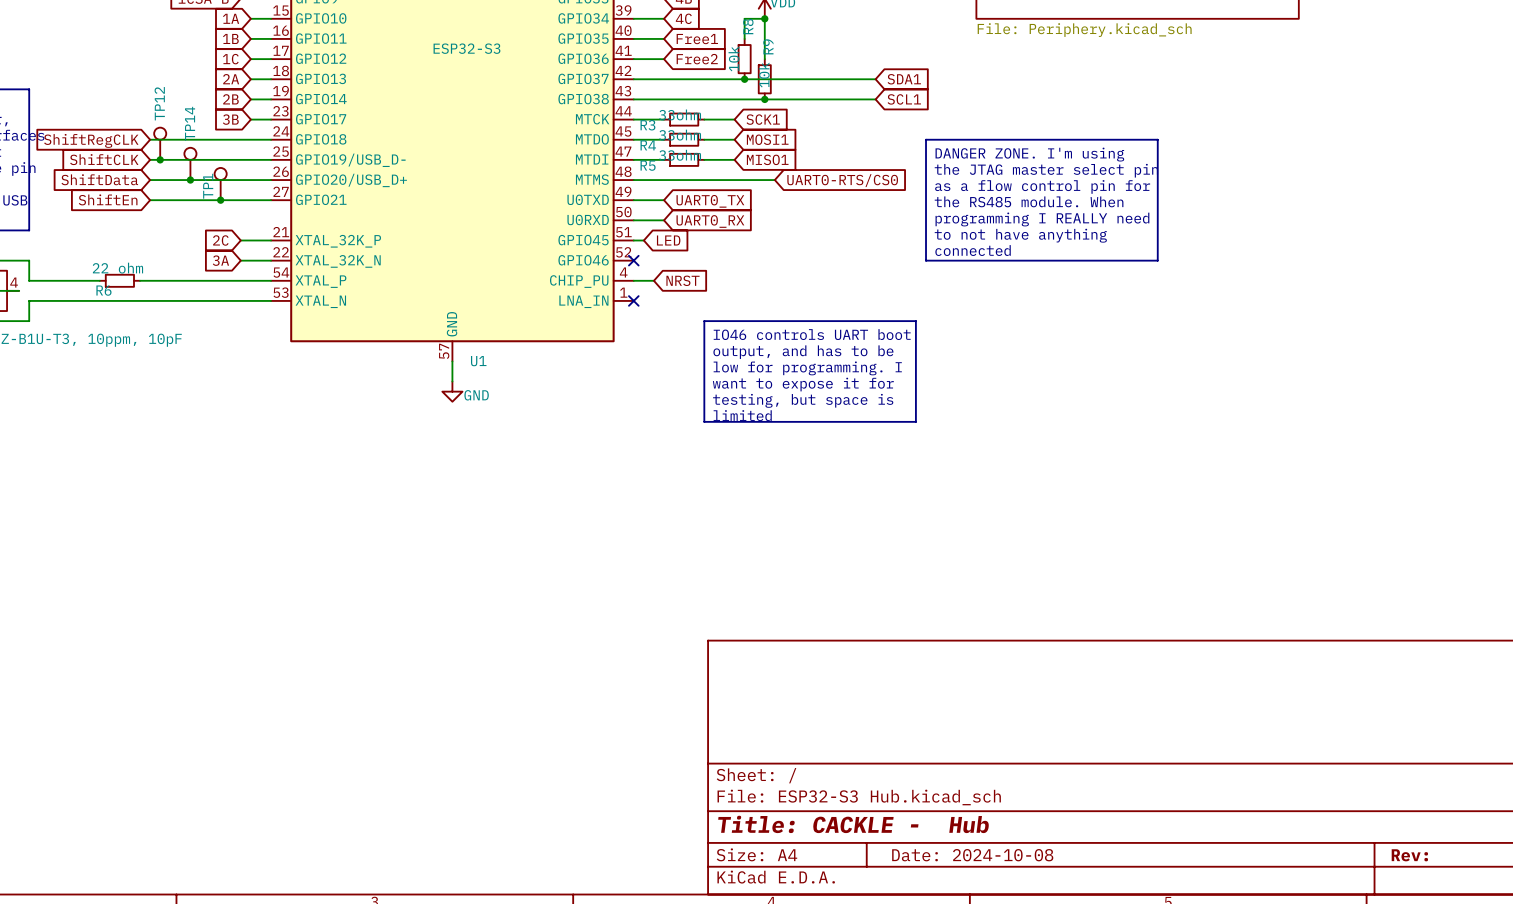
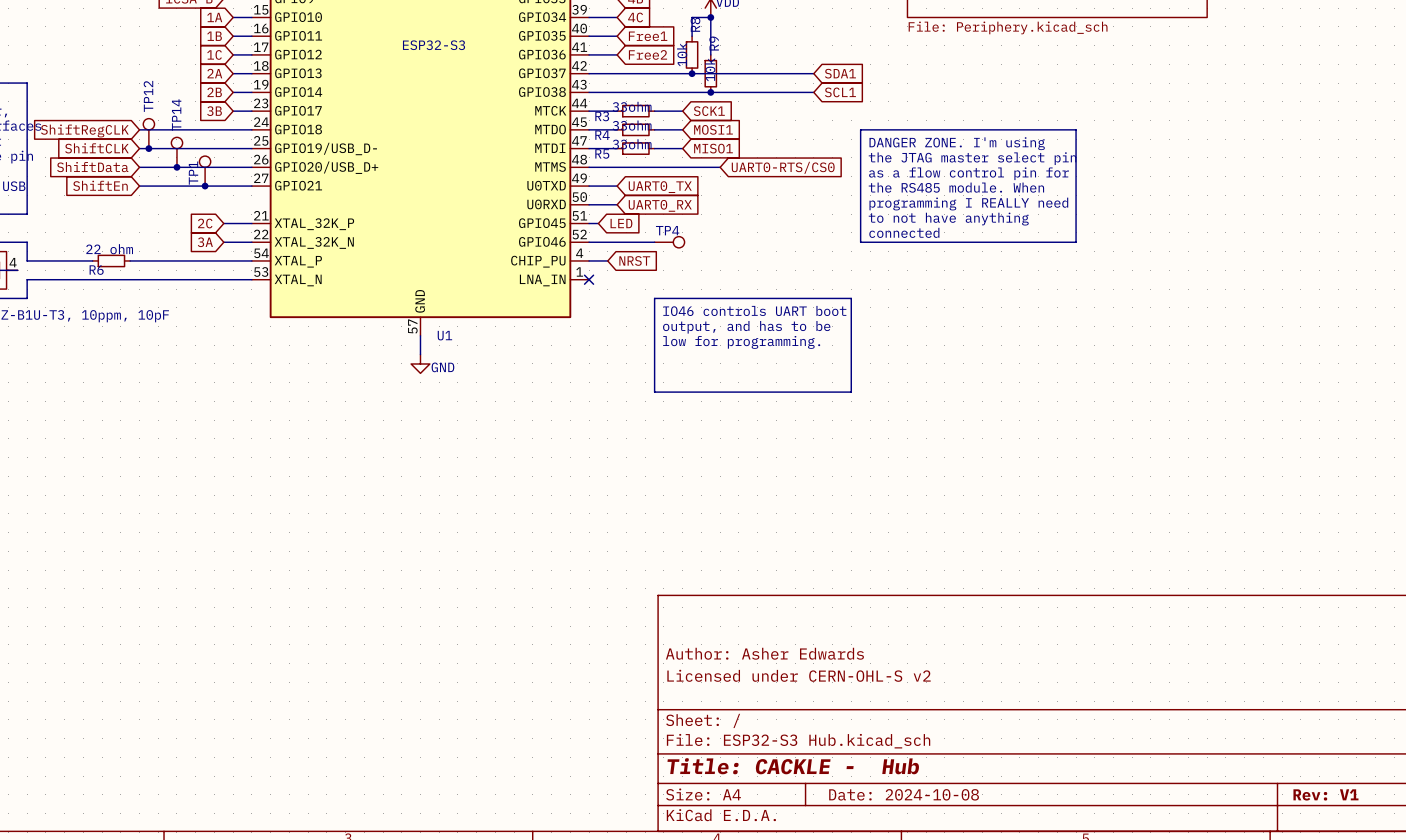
wire: none -> (589, 242) (654, 242)
no-connect mark: (633, 260) -> none
TP4: none -> (669, 242)
text: low for programming. I (807, 368) -> low for programming. (741, 342)
text: want to expose it for (803, 384) -> none
text: testing, but space is (803, 400) -> none
text: limited (742, 415) -> none
title block: none -> Author: Asher Edwards (764, 653)
title block: none -> Licensed under CERN-OHL-S v2 (799, 675)
title block: Rev: (1409, 855) -> Rev: V1 (1325, 794)

